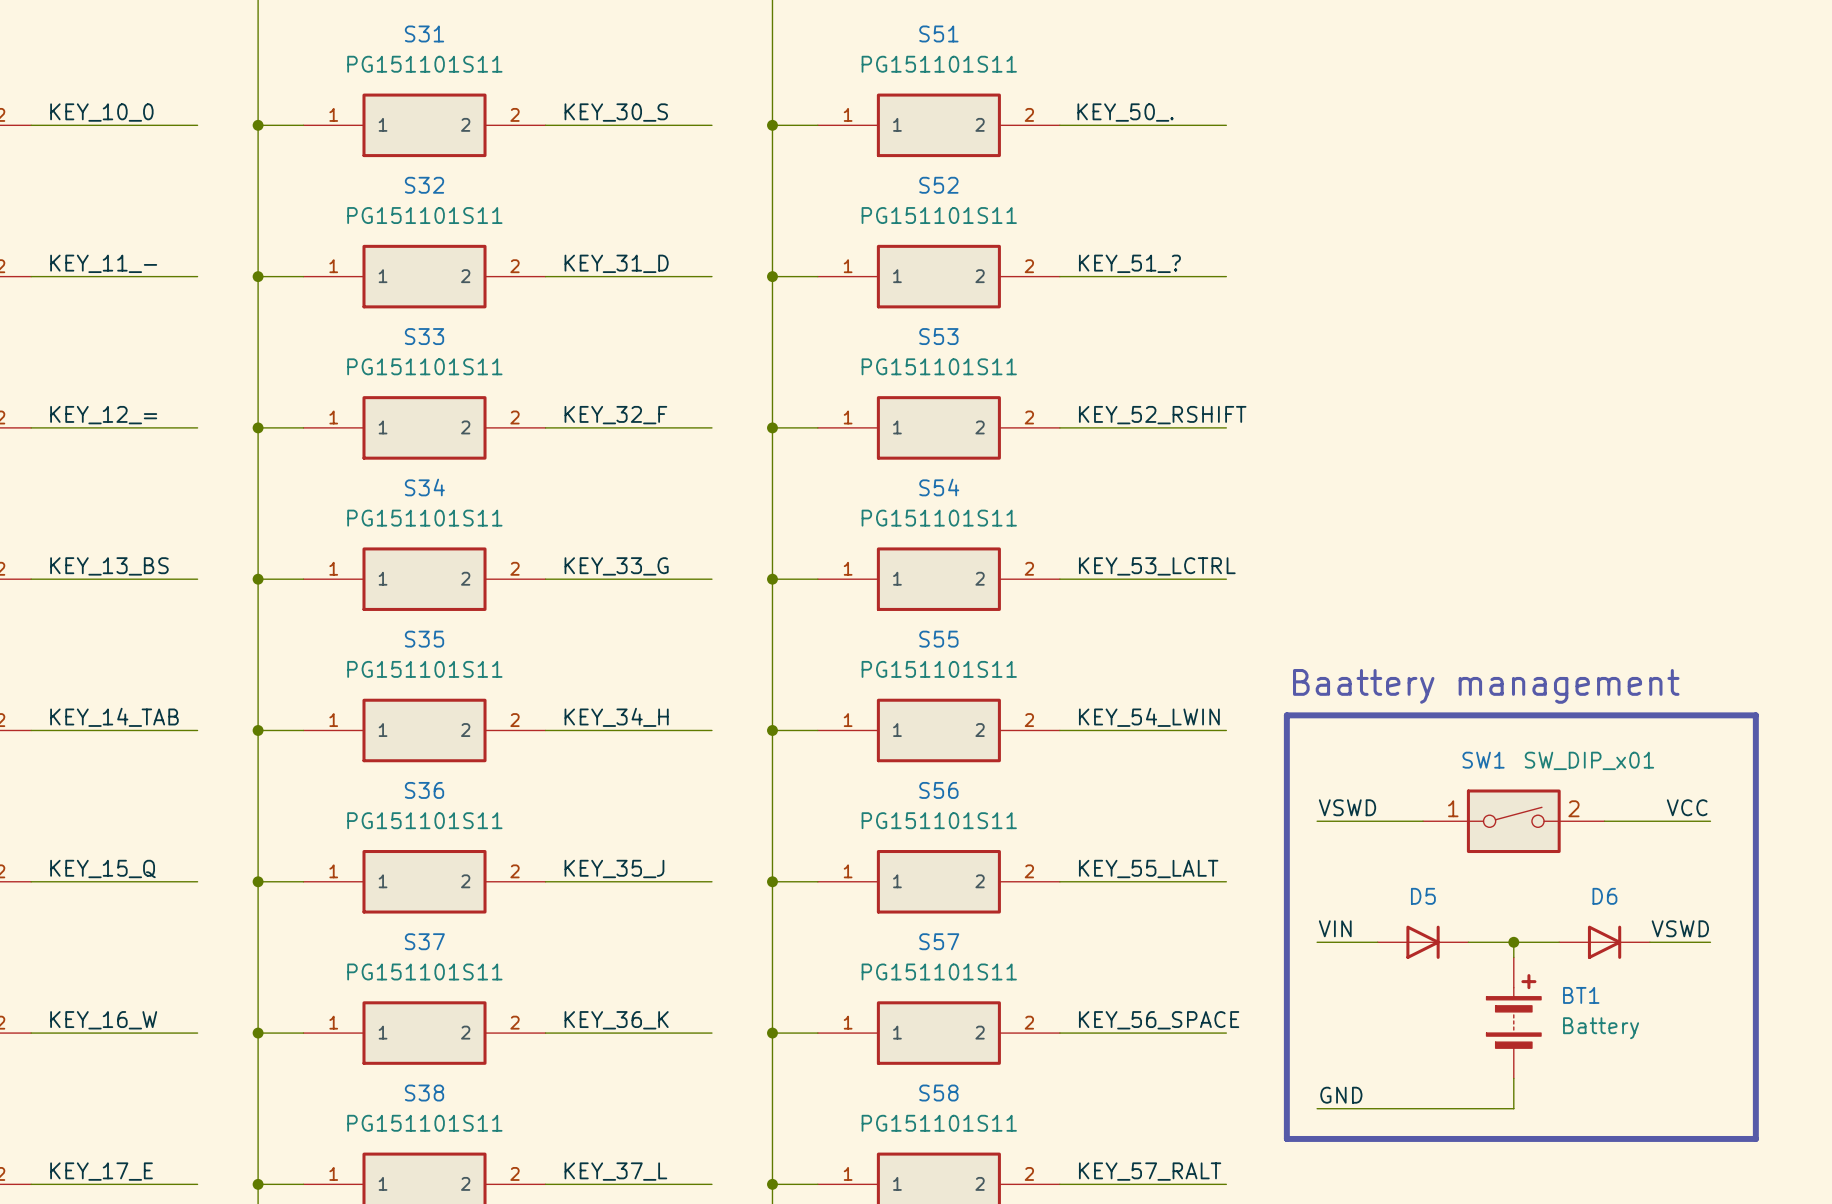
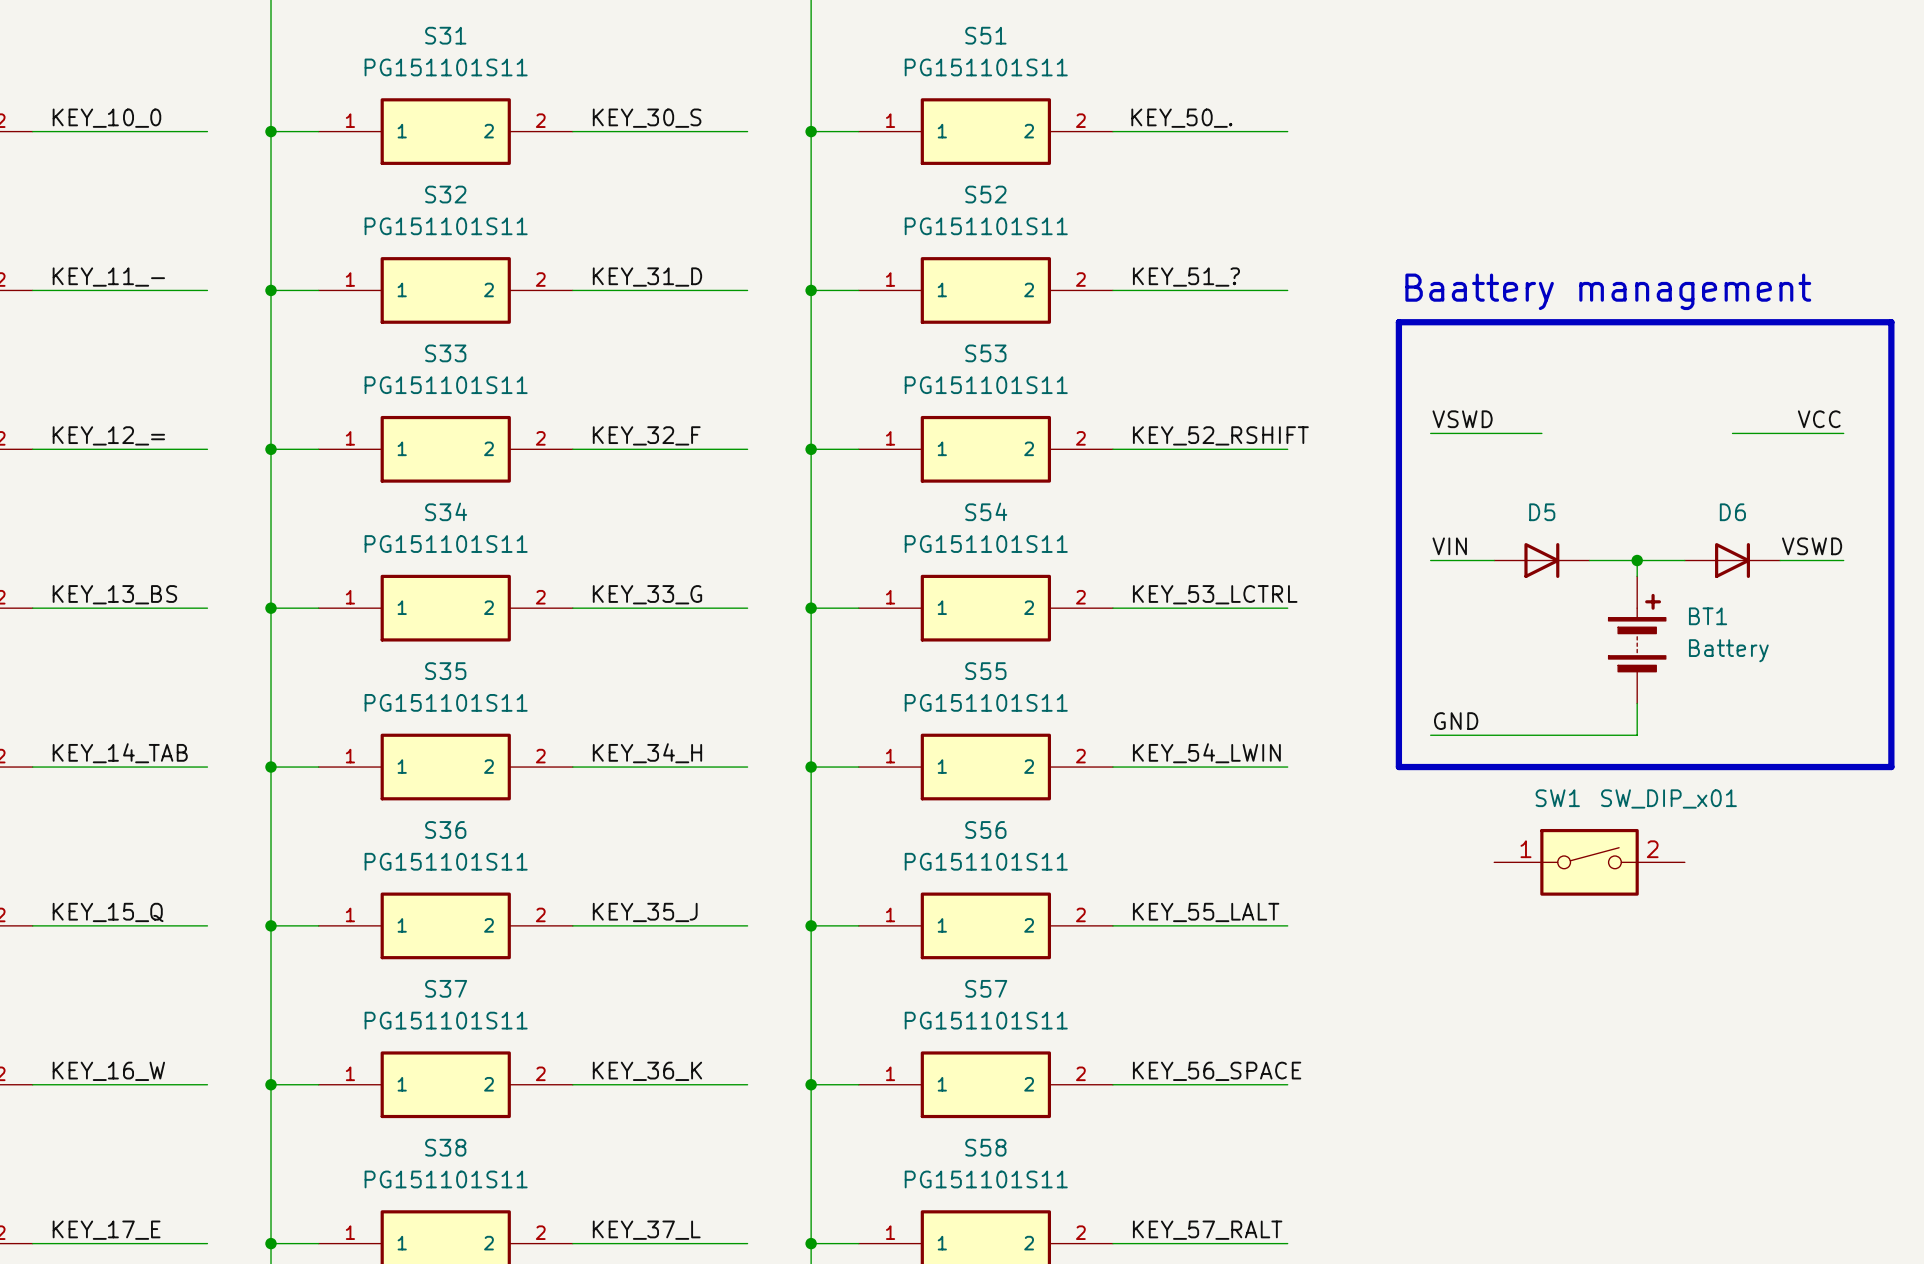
text: none -> Baattery management (1608, 291)
line: none -> (1398, 322) (1891, 322) (1891, 767) (1398, 767) (1398, 322)
label: none -> VSWD (1462, 419)
label: none -> VCC (1819, 419)
wire: none -> (1430, 433) (1541, 433)
wire: none -> (1732, 433) (1843, 433)
label: none -> VIN (1449, 546)
label: none -> VSWD (1812, 546)
wire: none -> (1430, 560) (1494, 560)
wire: none -> (1589, 560) (1684, 560)
wire: none -> (1637, 560) (1637, 576)
junction: none -> (1637, 560)
wire: none -> (1780, 560) (1843, 560)
wire: none -> (1637, 703) (1637, 735) (1430, 735)
label: none -> GND (1456, 721)
text: Baattery management (1486, 686) -> none
line: (1286, 715) (1755, 715) (1755, 1138) (1286, 1138) (1286, 715) -> none
label: VSWD (1347, 807) -> none
label: VCC (1687, 807) -> none
wire: (1317, 821) (1423, 821) -> none
wire: (1604, 821) (1710, 821) -> none
label: VIN (1335, 928) -> none
label: VSWD (1680, 928) -> none
wire: (1317, 942) (1377, 942) -> none
D5 position: (1423, 942) -> (1541, 560)
wire: (1468, 942) (1559, 942) -> none
wire: (1513, 942) (1513, 957) -> none
junction: (1513, 942) -> none
D6 position: (1604, 942) -> (1732, 560)
wire: (1649, 942) (1710, 942) -> none
BT1 position: (1513, 1017) -> (1637, 639)
wire: (1513, 1078) (1513, 1108) (1317, 1108) -> none
label: GND (1341, 1095) -> none

